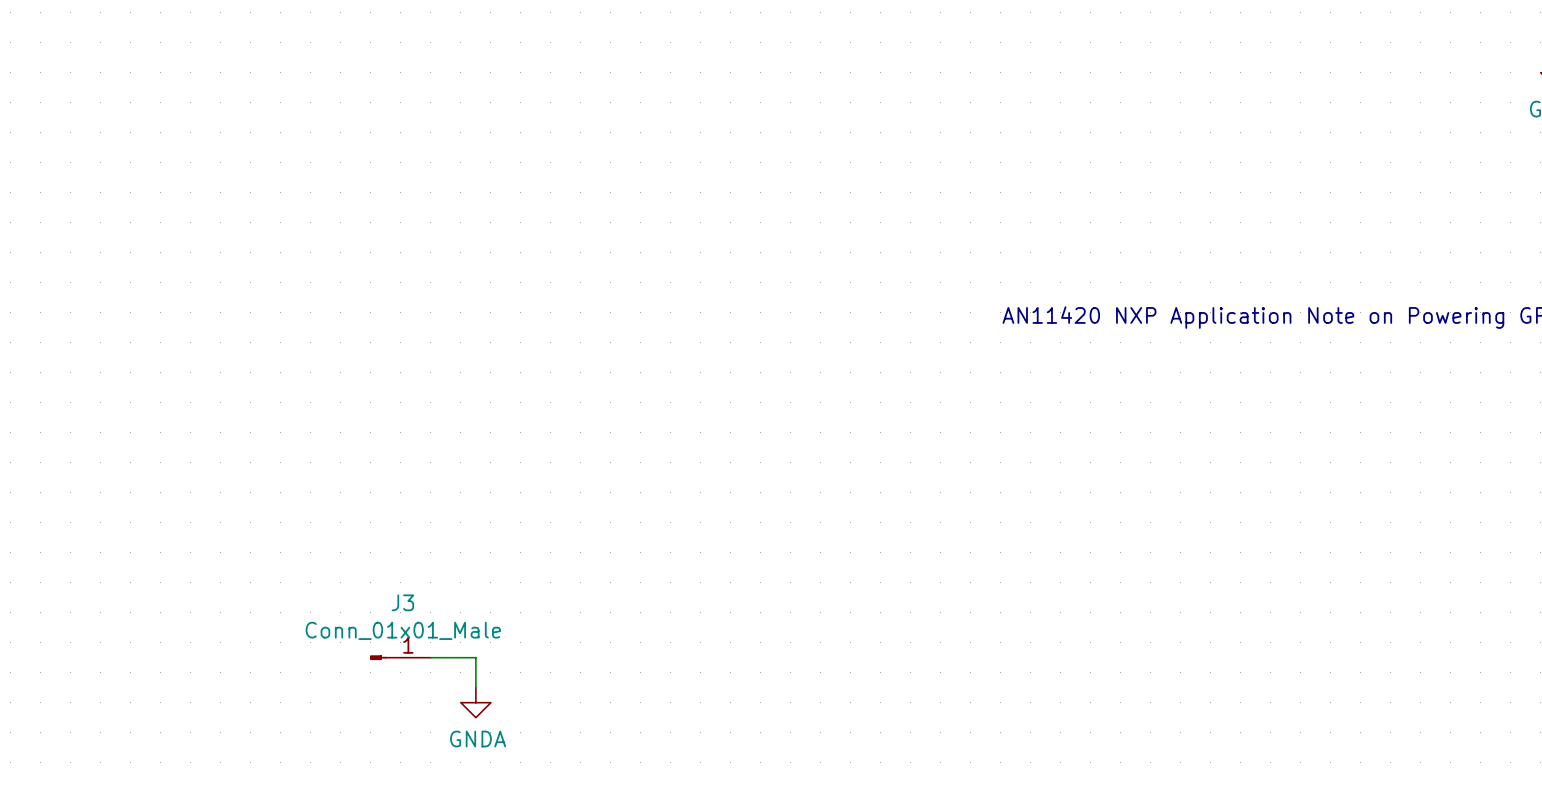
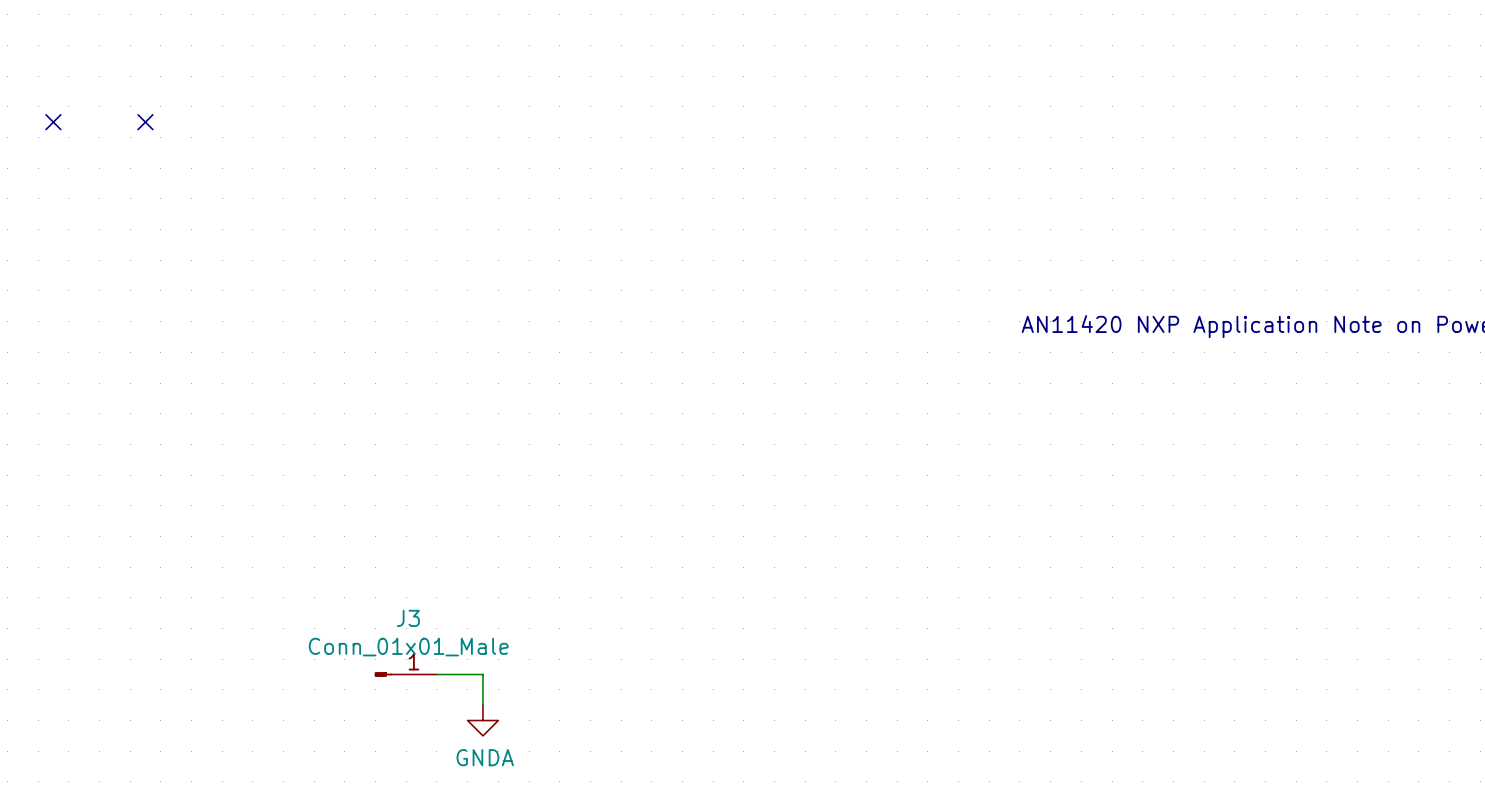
no-connect mark: none -> (53, 122)
no-connect mark: none -> (145, 122)

